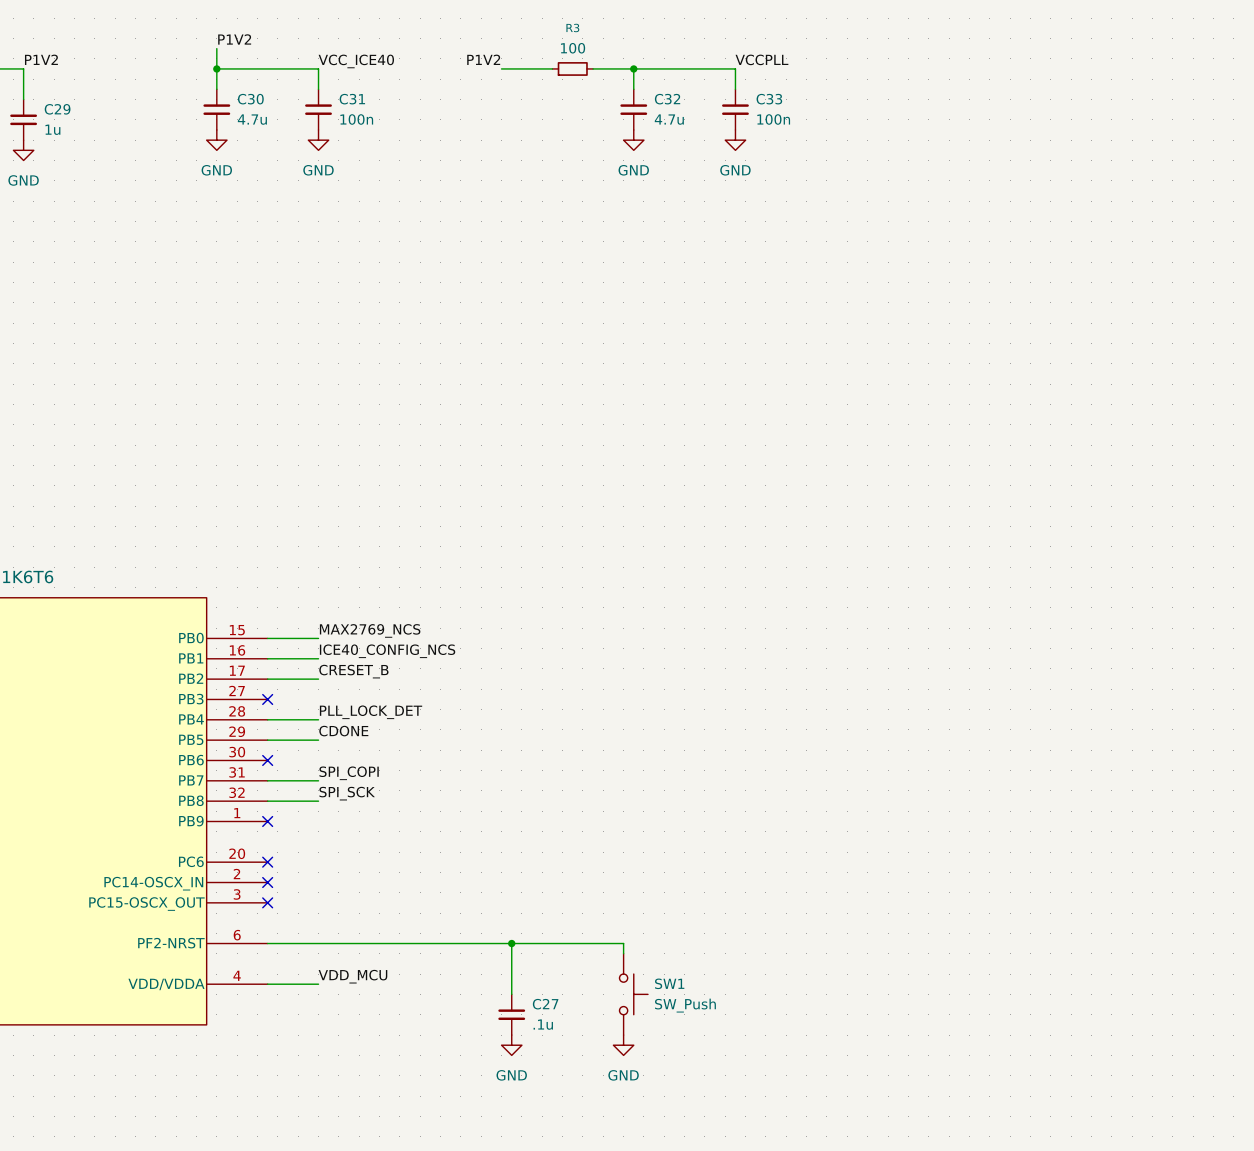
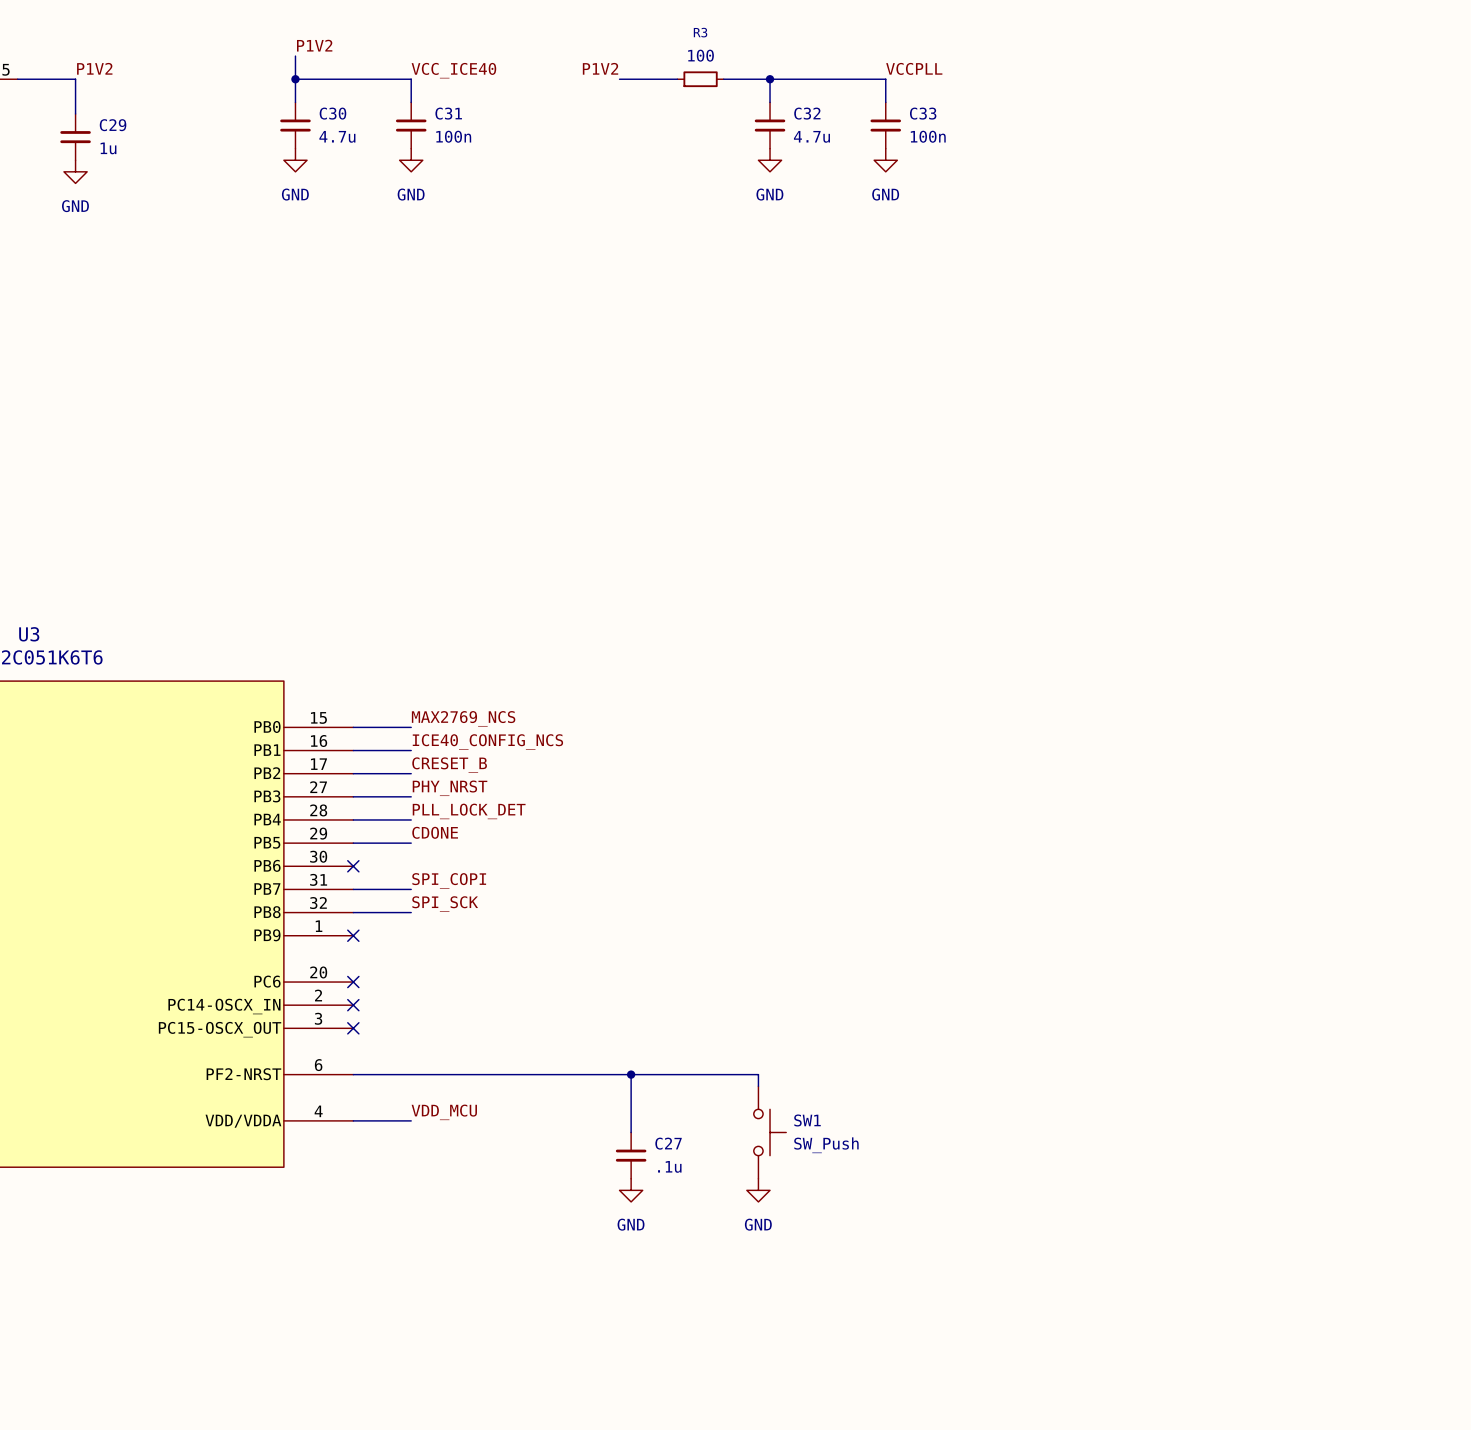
label: none -> PHY_NRST (450, 788)
wire: none -> (353, 796) (411, 796)
no-connect mark: (267, 699) -> none

